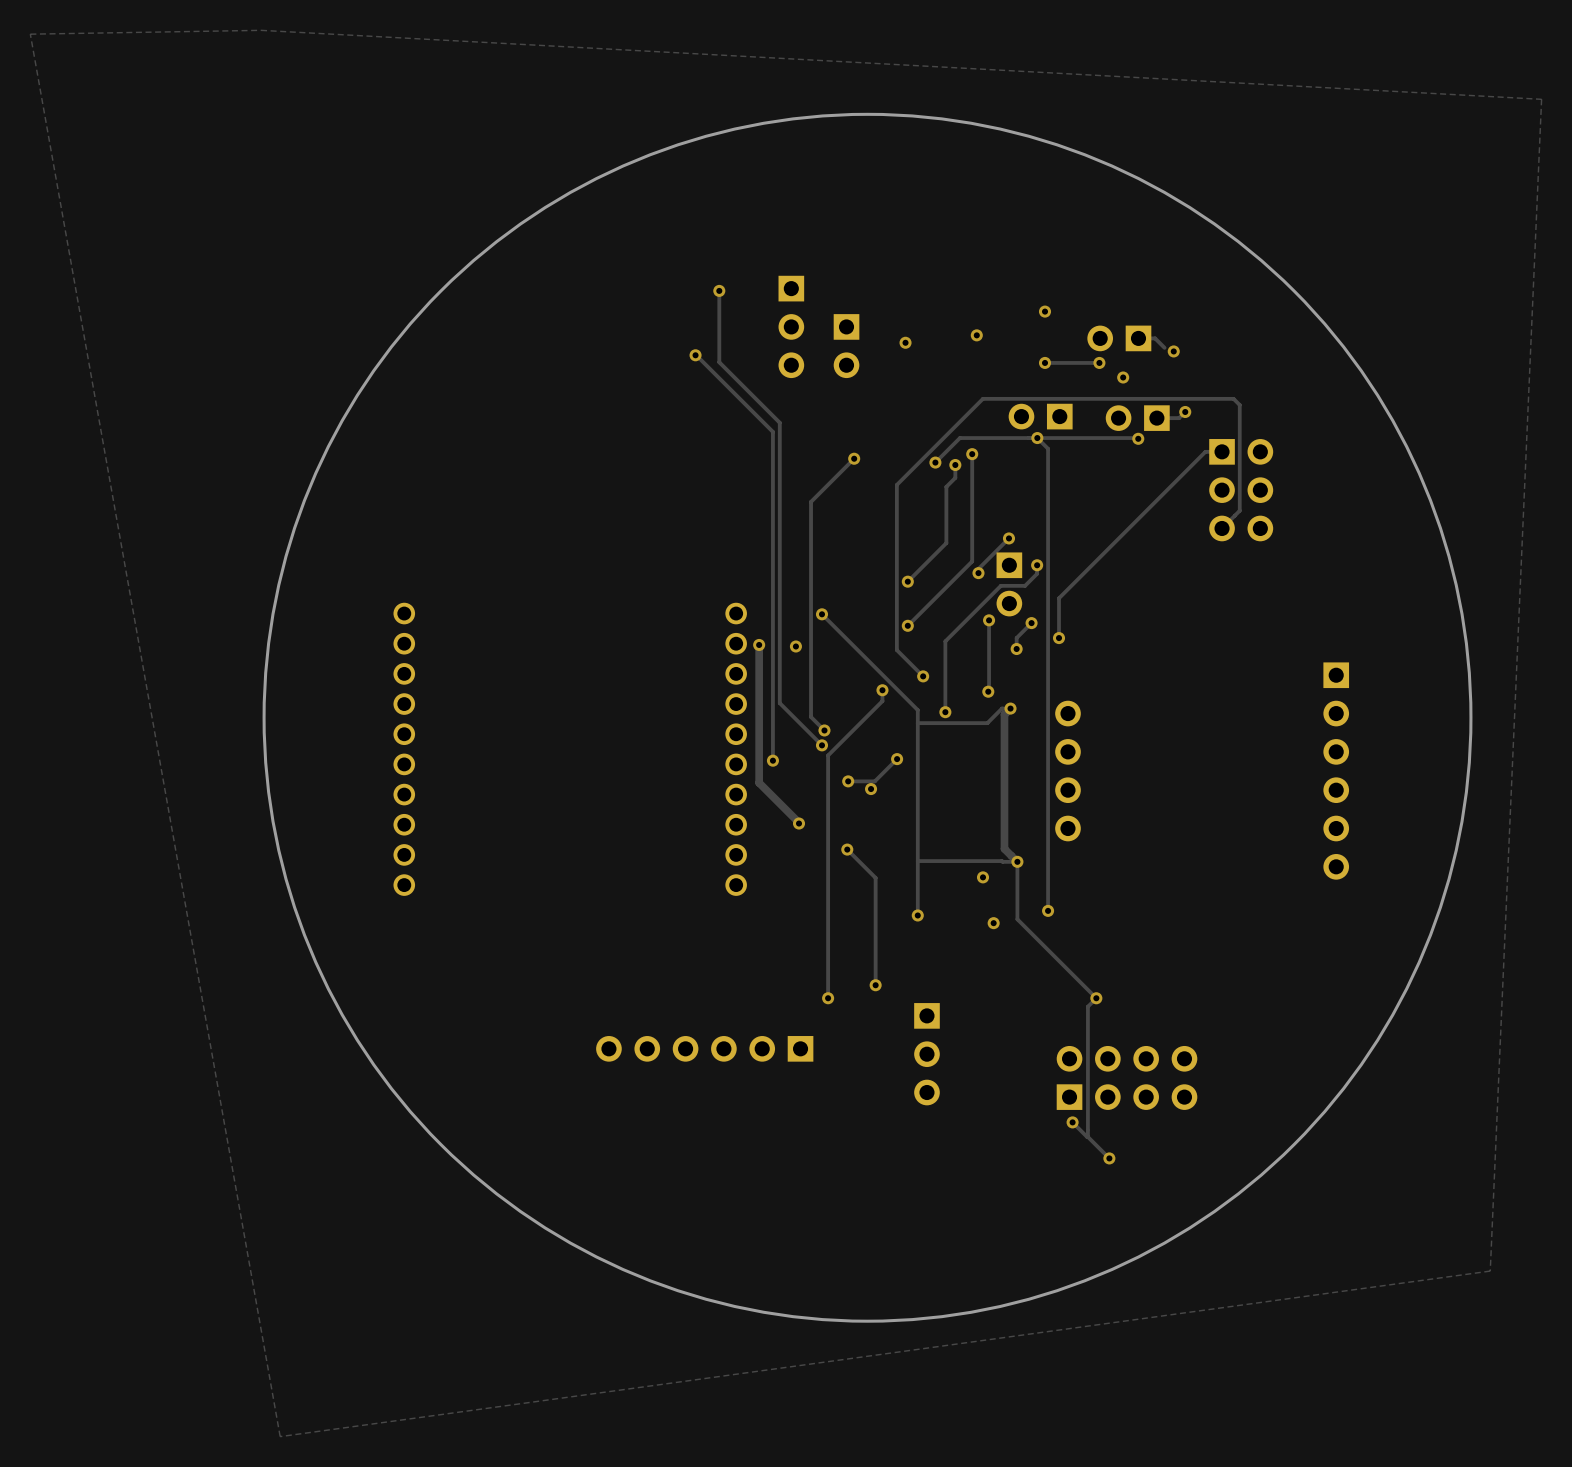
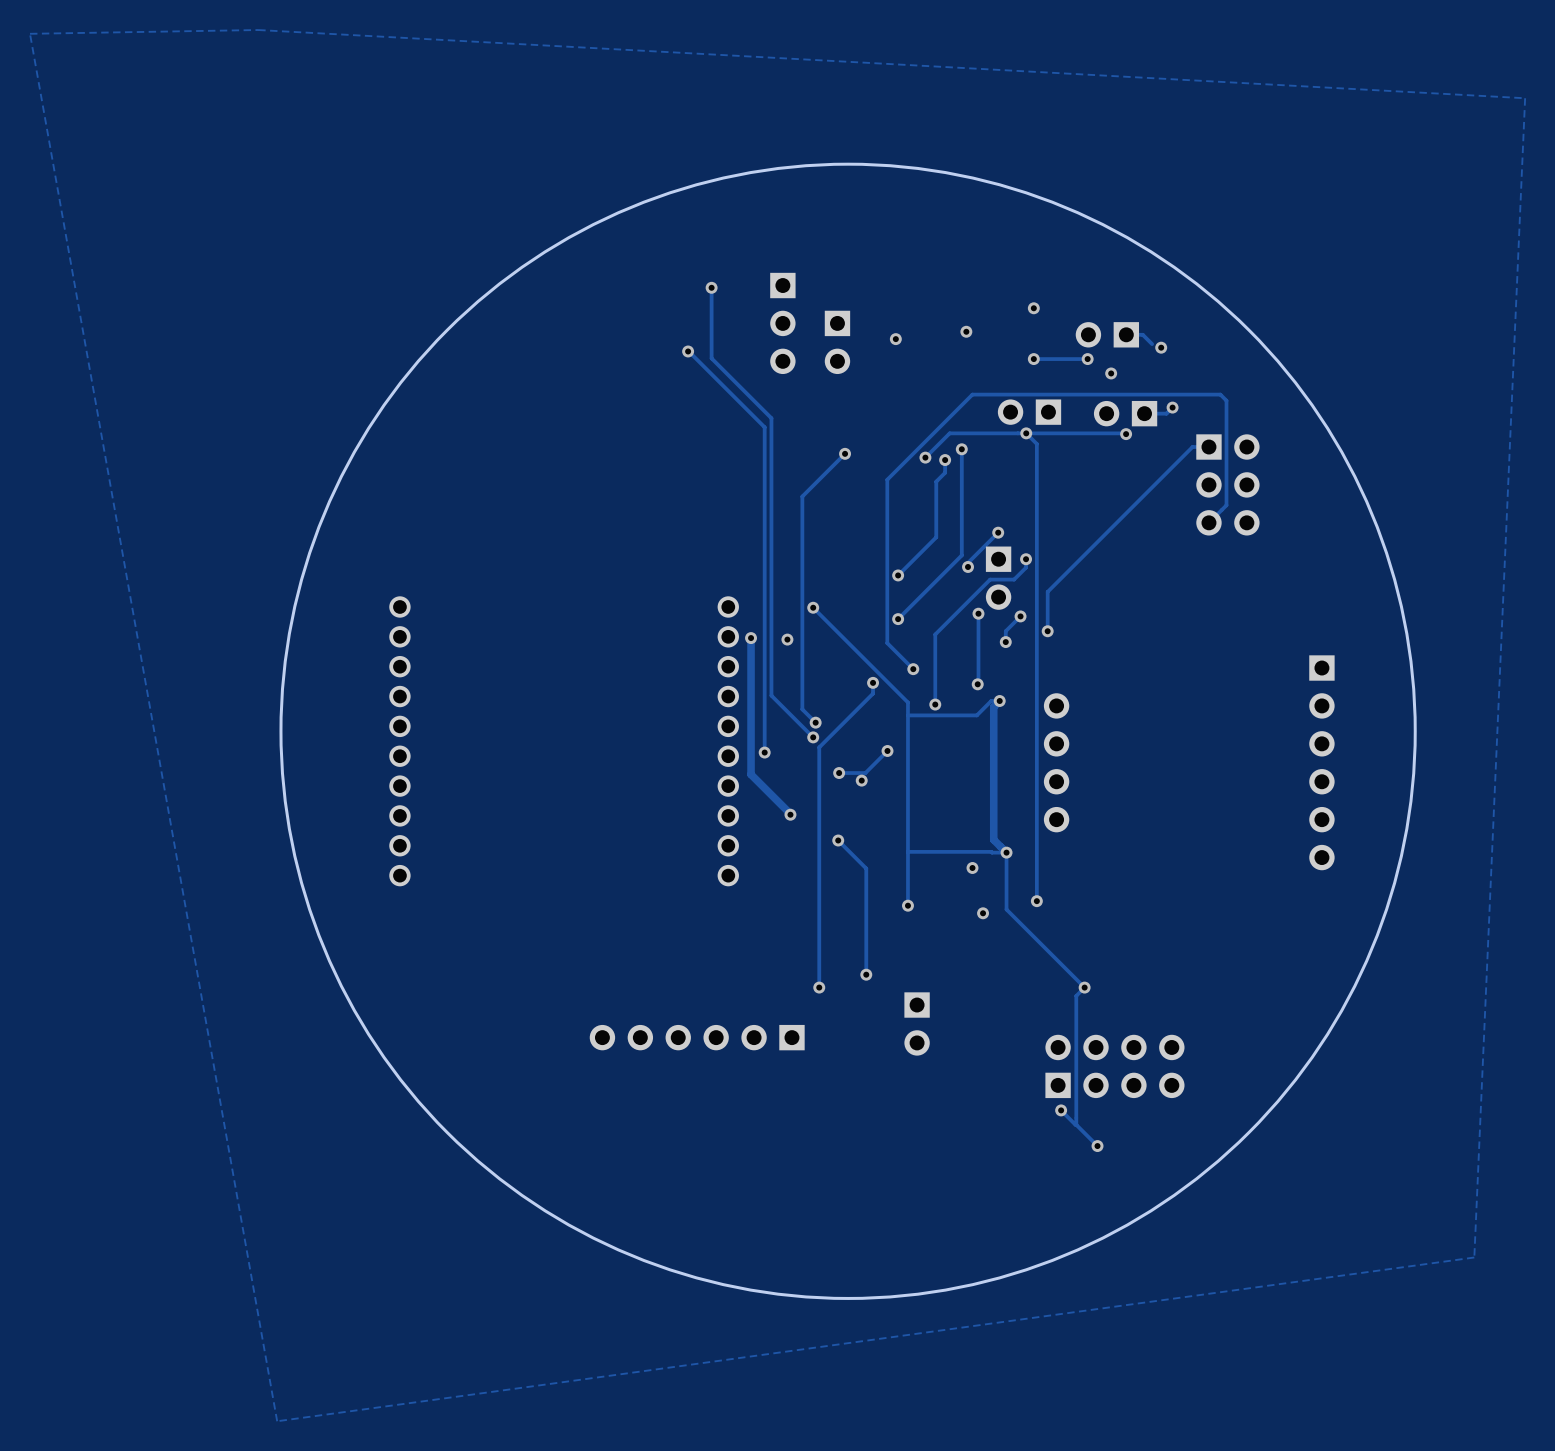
round board edge: [262, 112, 1473, 1323] -> none
round board edge: none -> [279, 162, 1417, 1300]
part: (926, 1054) -> none

